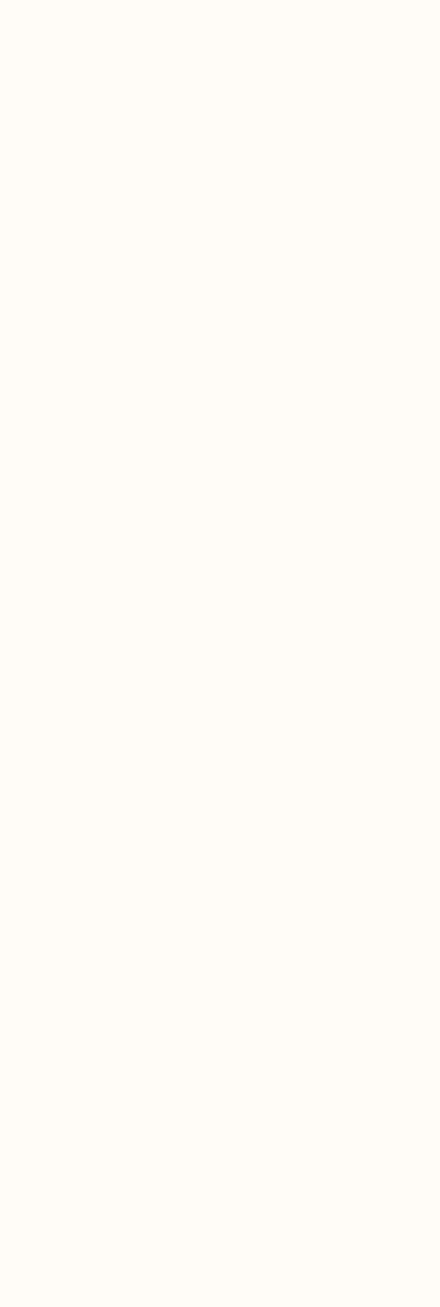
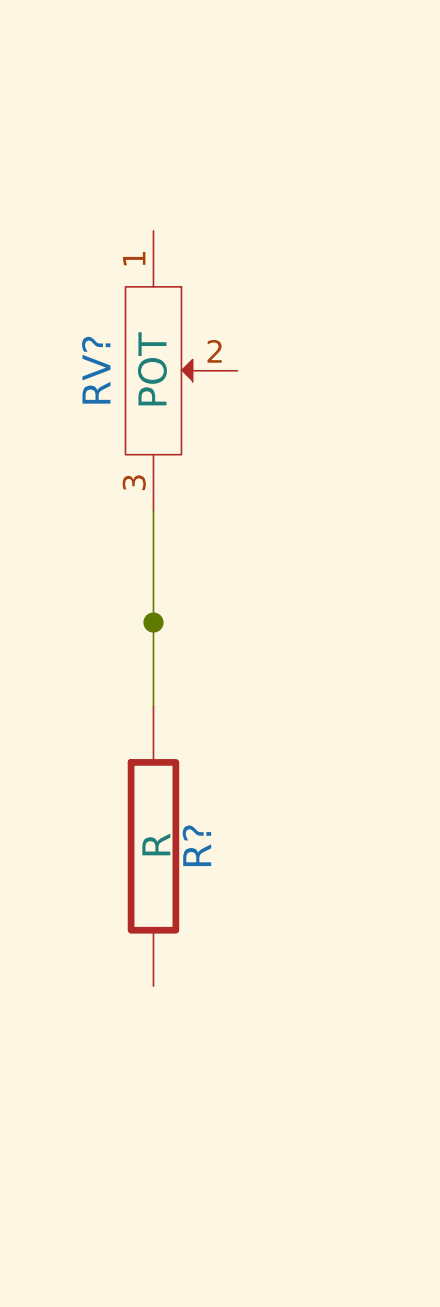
RV?: none -> POT (181, 370)
wire: none -> (153, 510) (153, 706)
junction: none -> (153, 622)
R?: none -> R (153, 846)

